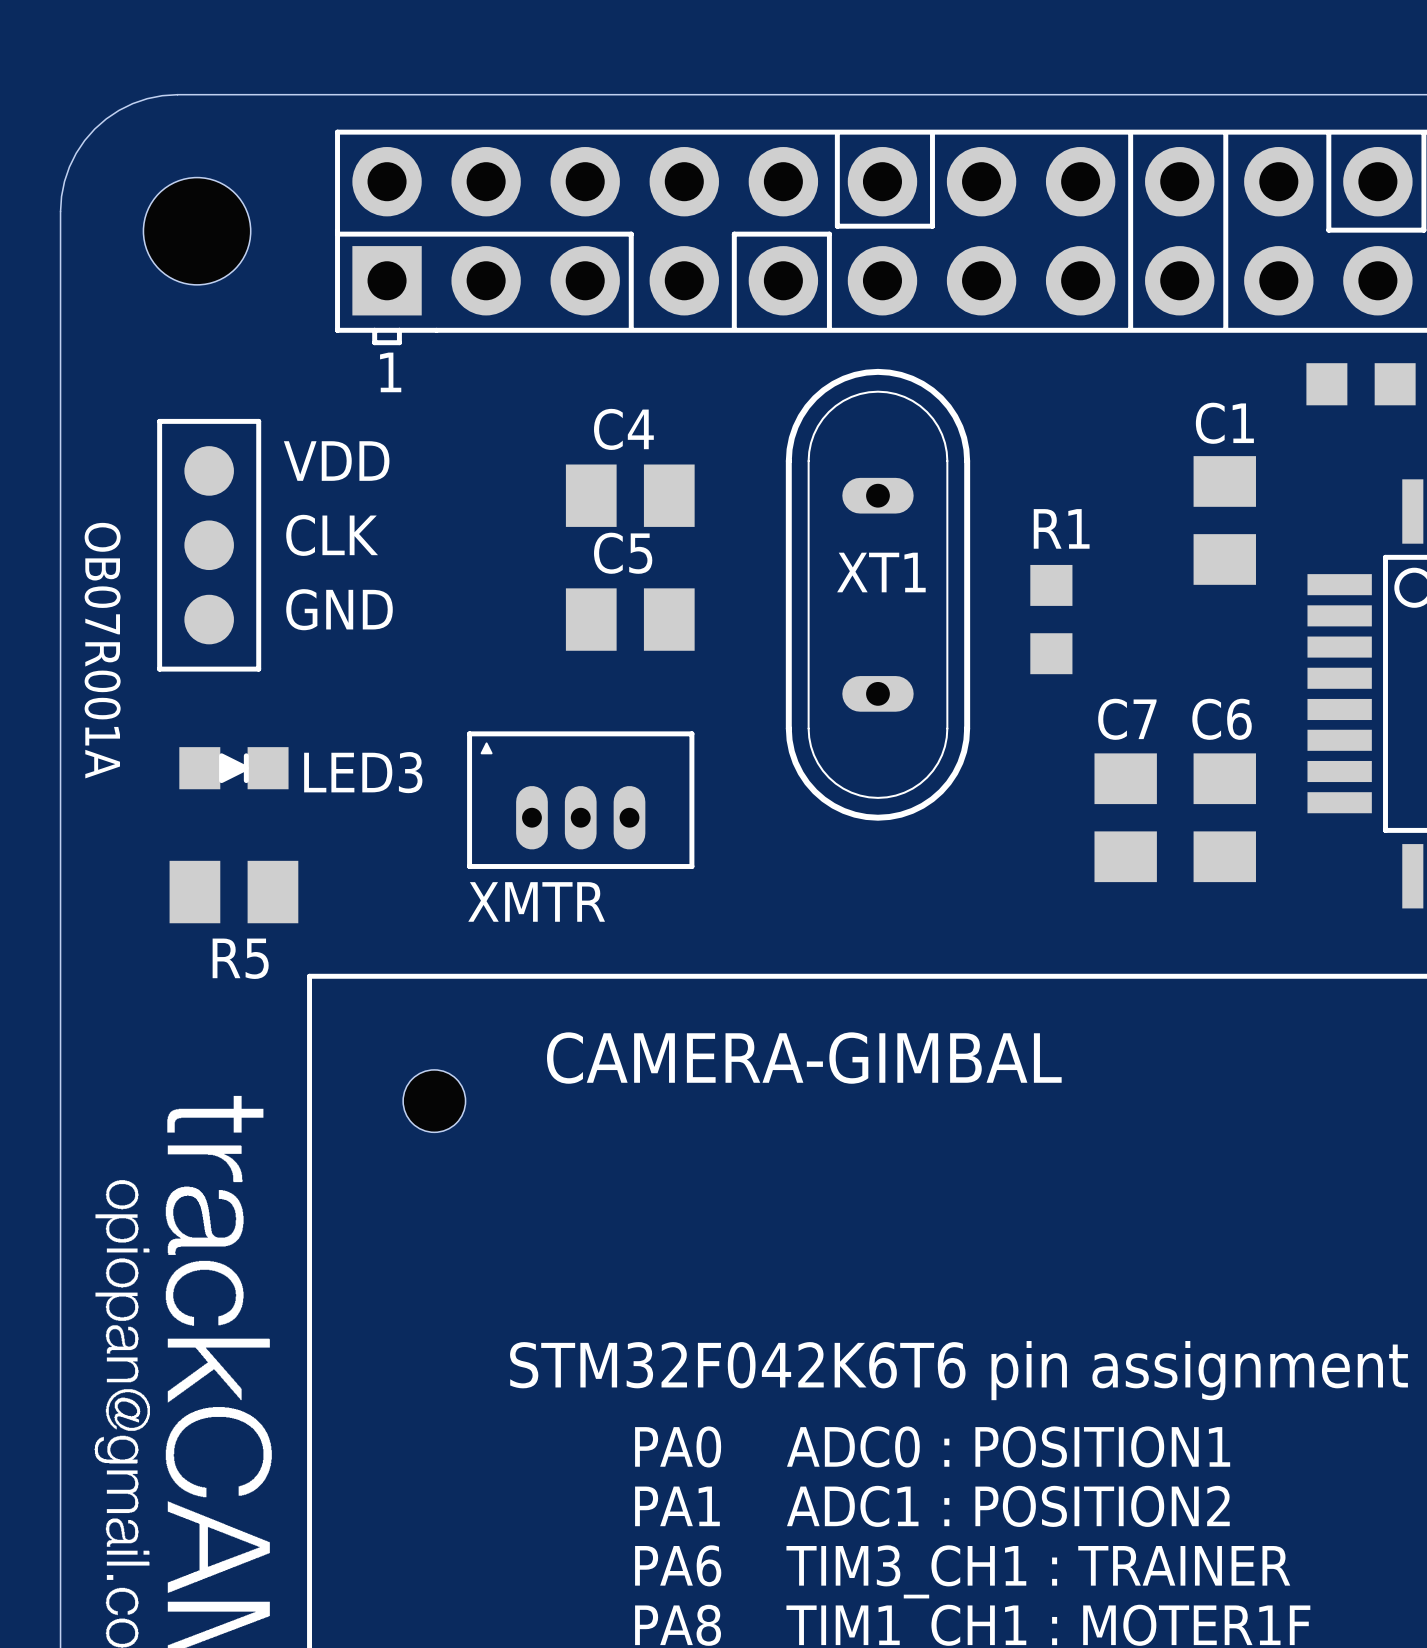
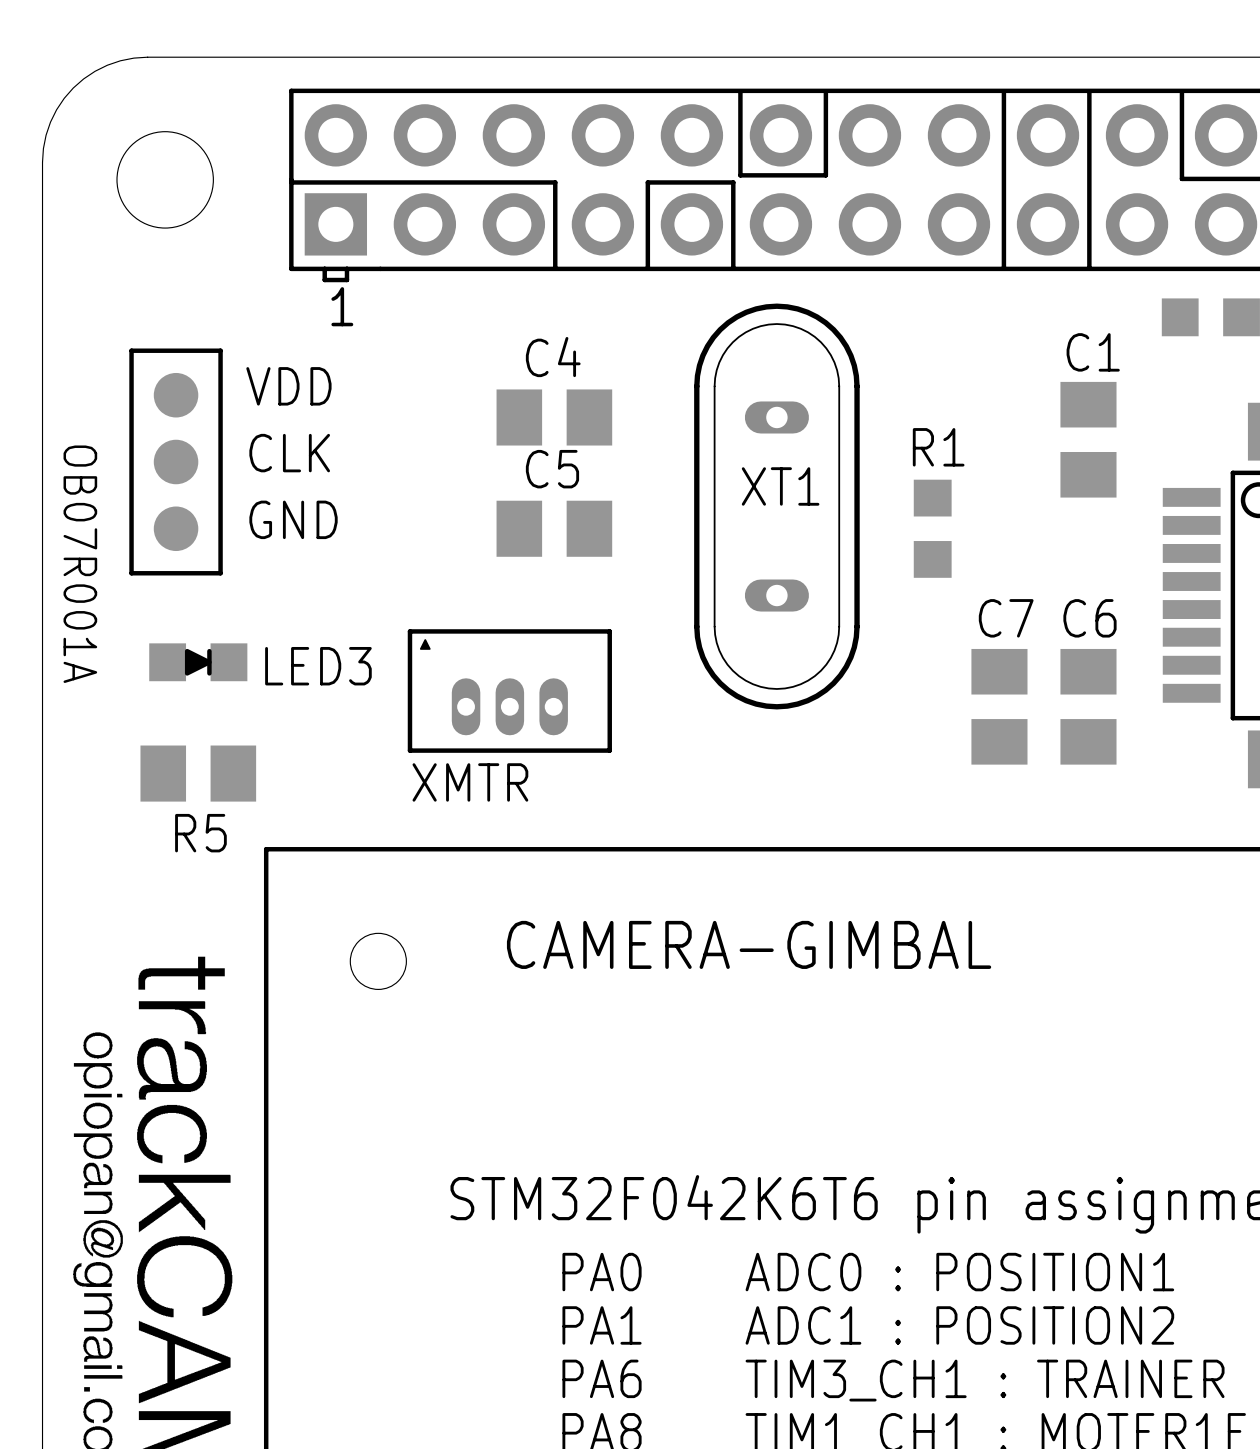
CAMERA-GIMBAL name position: CAMERA-GIMBAL (804, 1058) -> CAMERA-GIMBAL (749, 944)

